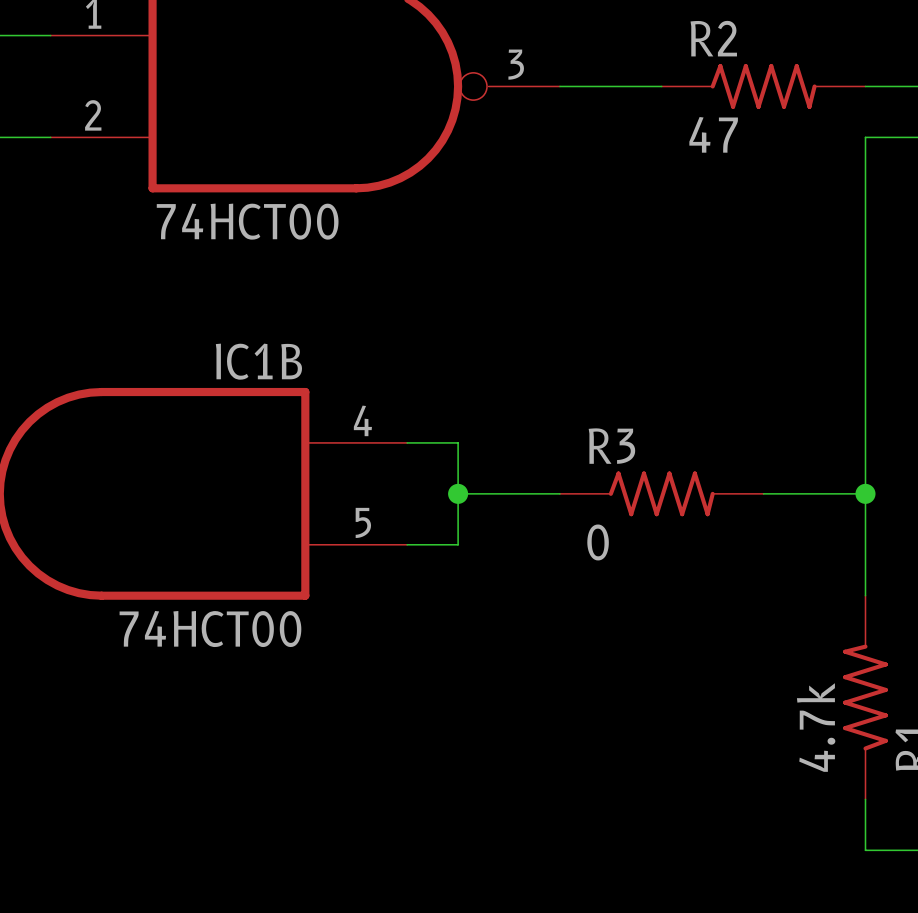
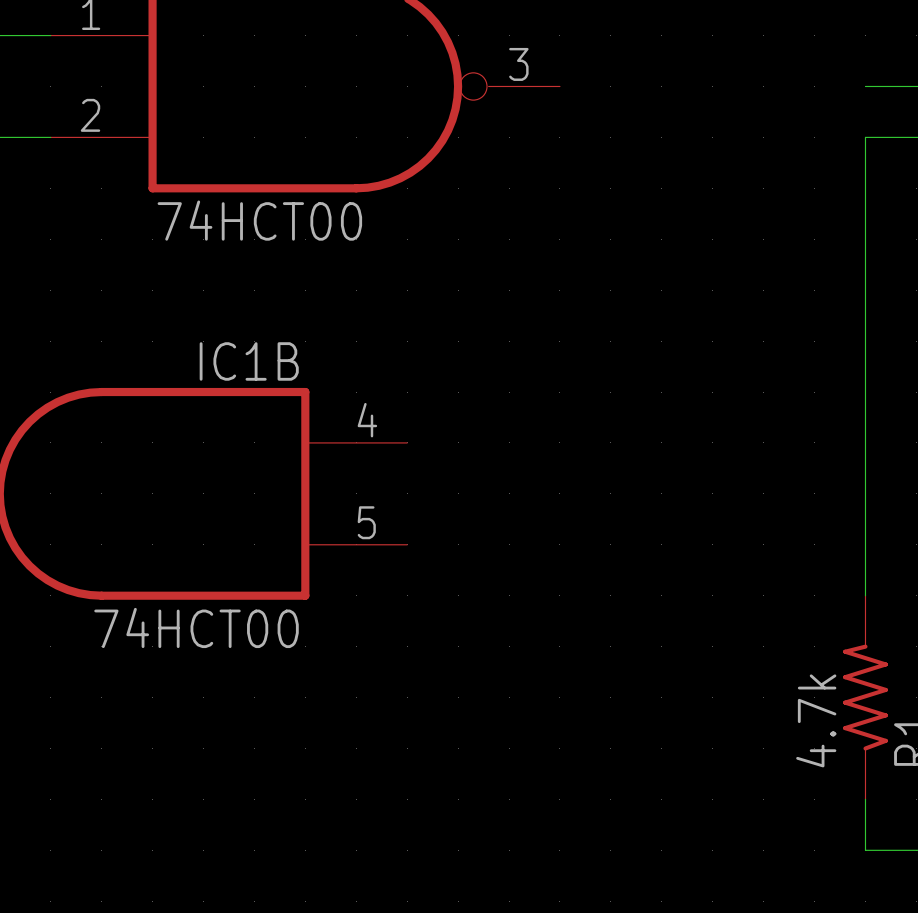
wire: (559, 86) (661, 86) -> none
R2: 47 (763, 86) -> none
wire: (407, 442) (458, 442) (458, 544) (407, 544) -> none
wire: (458, 493) (559, 493) -> none
junction: (458, 493) -> none
R3: 0 (661, 493) -> none
wire: (763, 493) (865, 493) -> none
junction: (865, 493) -> none

